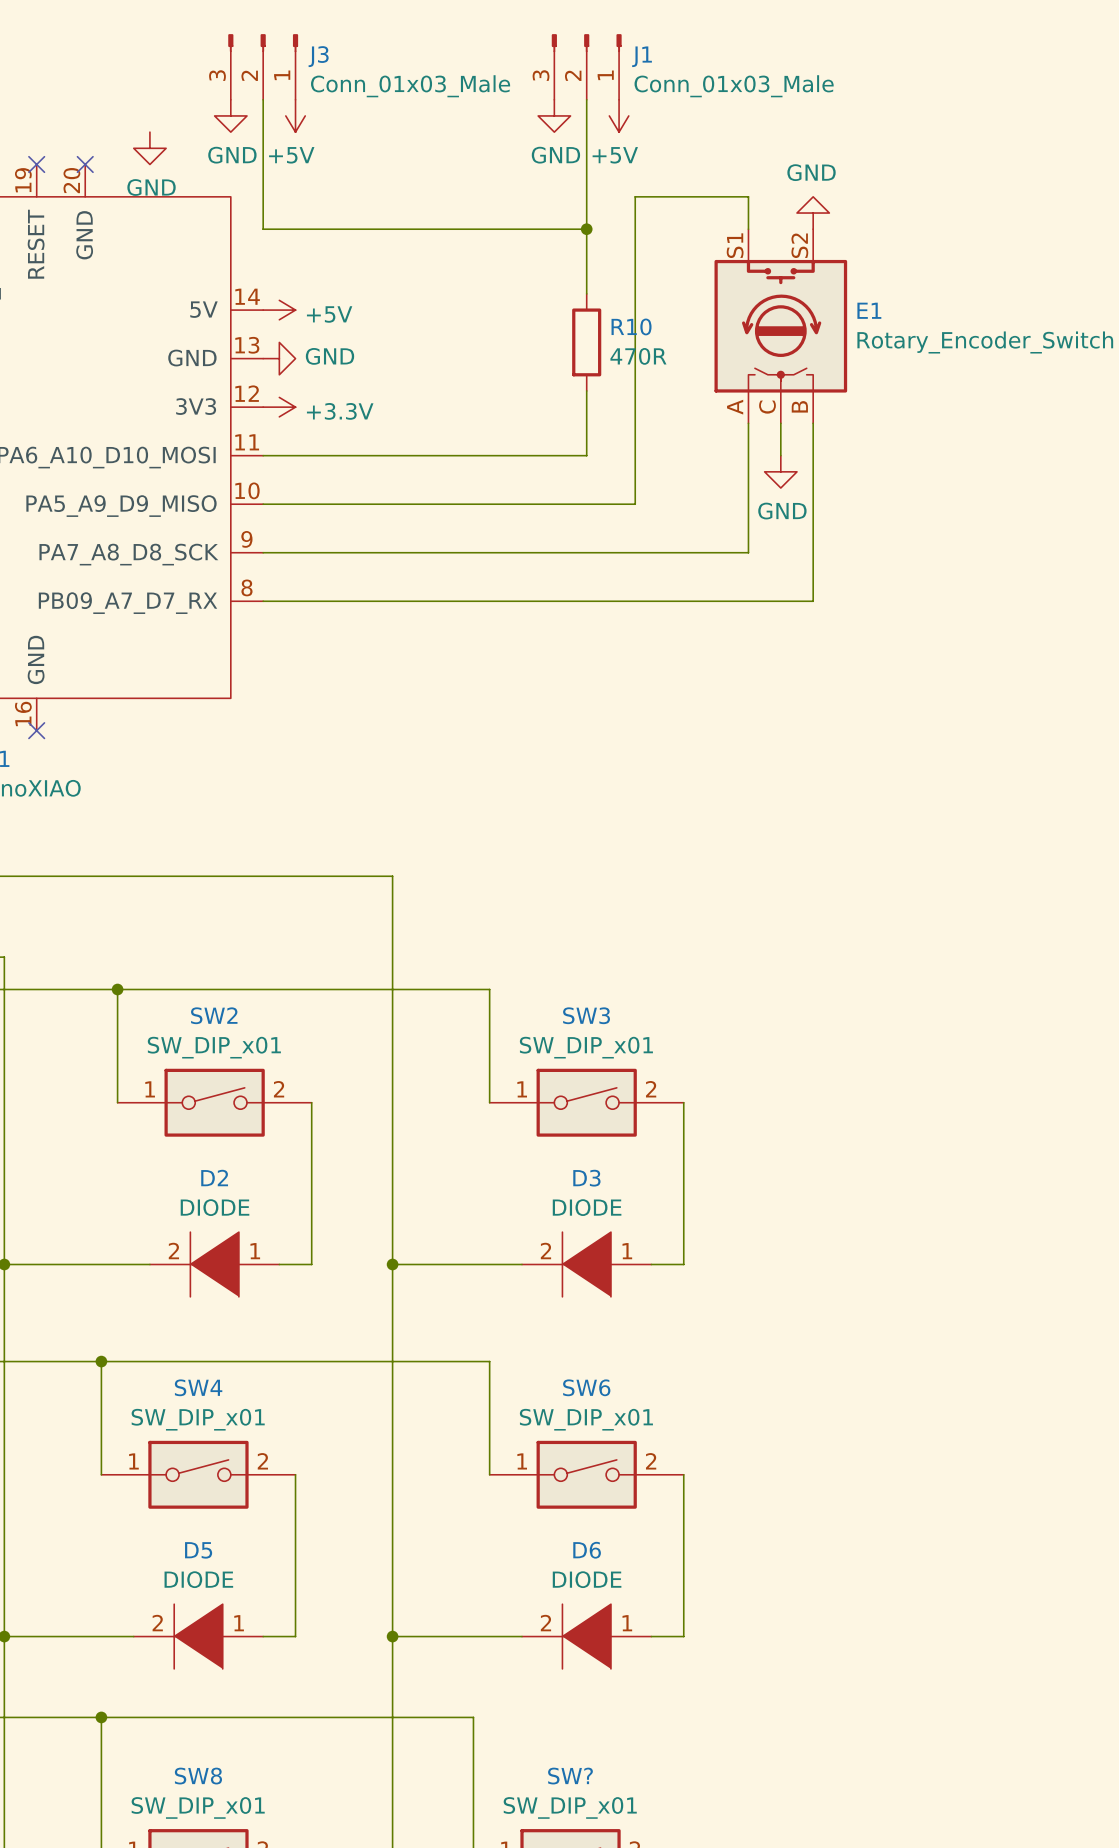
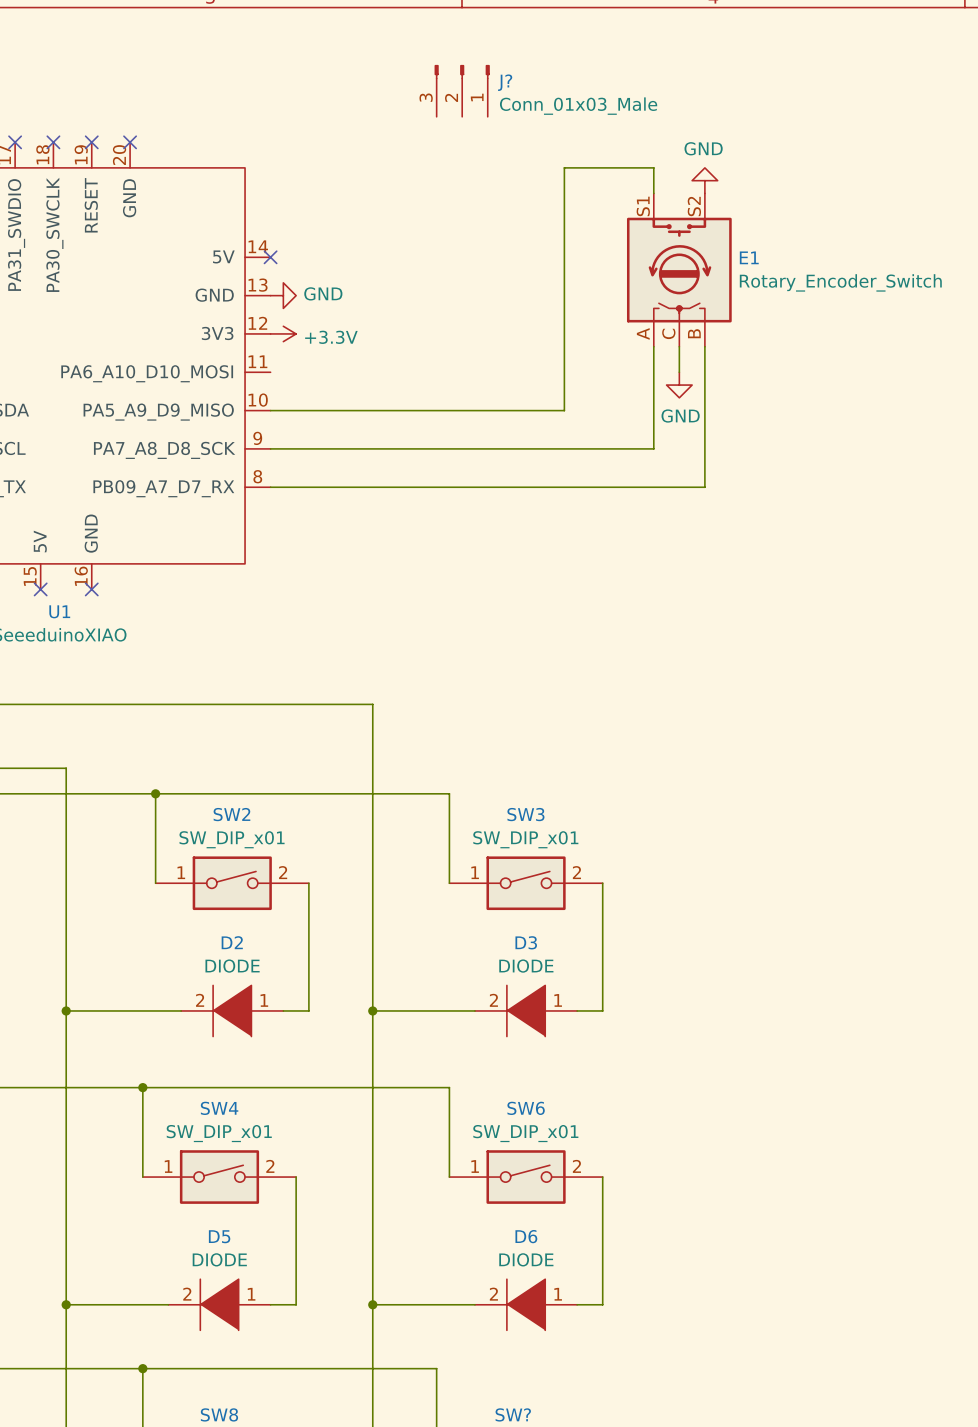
J3: Conn_01x03_Male (263, 66) -> none
J1: Conn_01x03_Male (586, 66) -> none
wire: (263, 99) (263, 229) (586, 229) -> none
J?: none -> Conn_01x03_Male (462, 90)
wire: (586, 99) (586, 293) -> none
power symbol: GND (230, 115) -> none
power symbol: +5V (295, 115) -> none
power symbol: GND (554, 115) -> none
power symbol: +5V (619, 115) -> none
power symbol: GND (149, 148) -> none
junction: (586, 229) -> none
no-connect mark: none -> (270, 257)
power symbol: +5V (279, 310) -> none
R10: 470R (586, 342) -> none
wire: (586, 390) (586, 455) (263, 455) -> none

